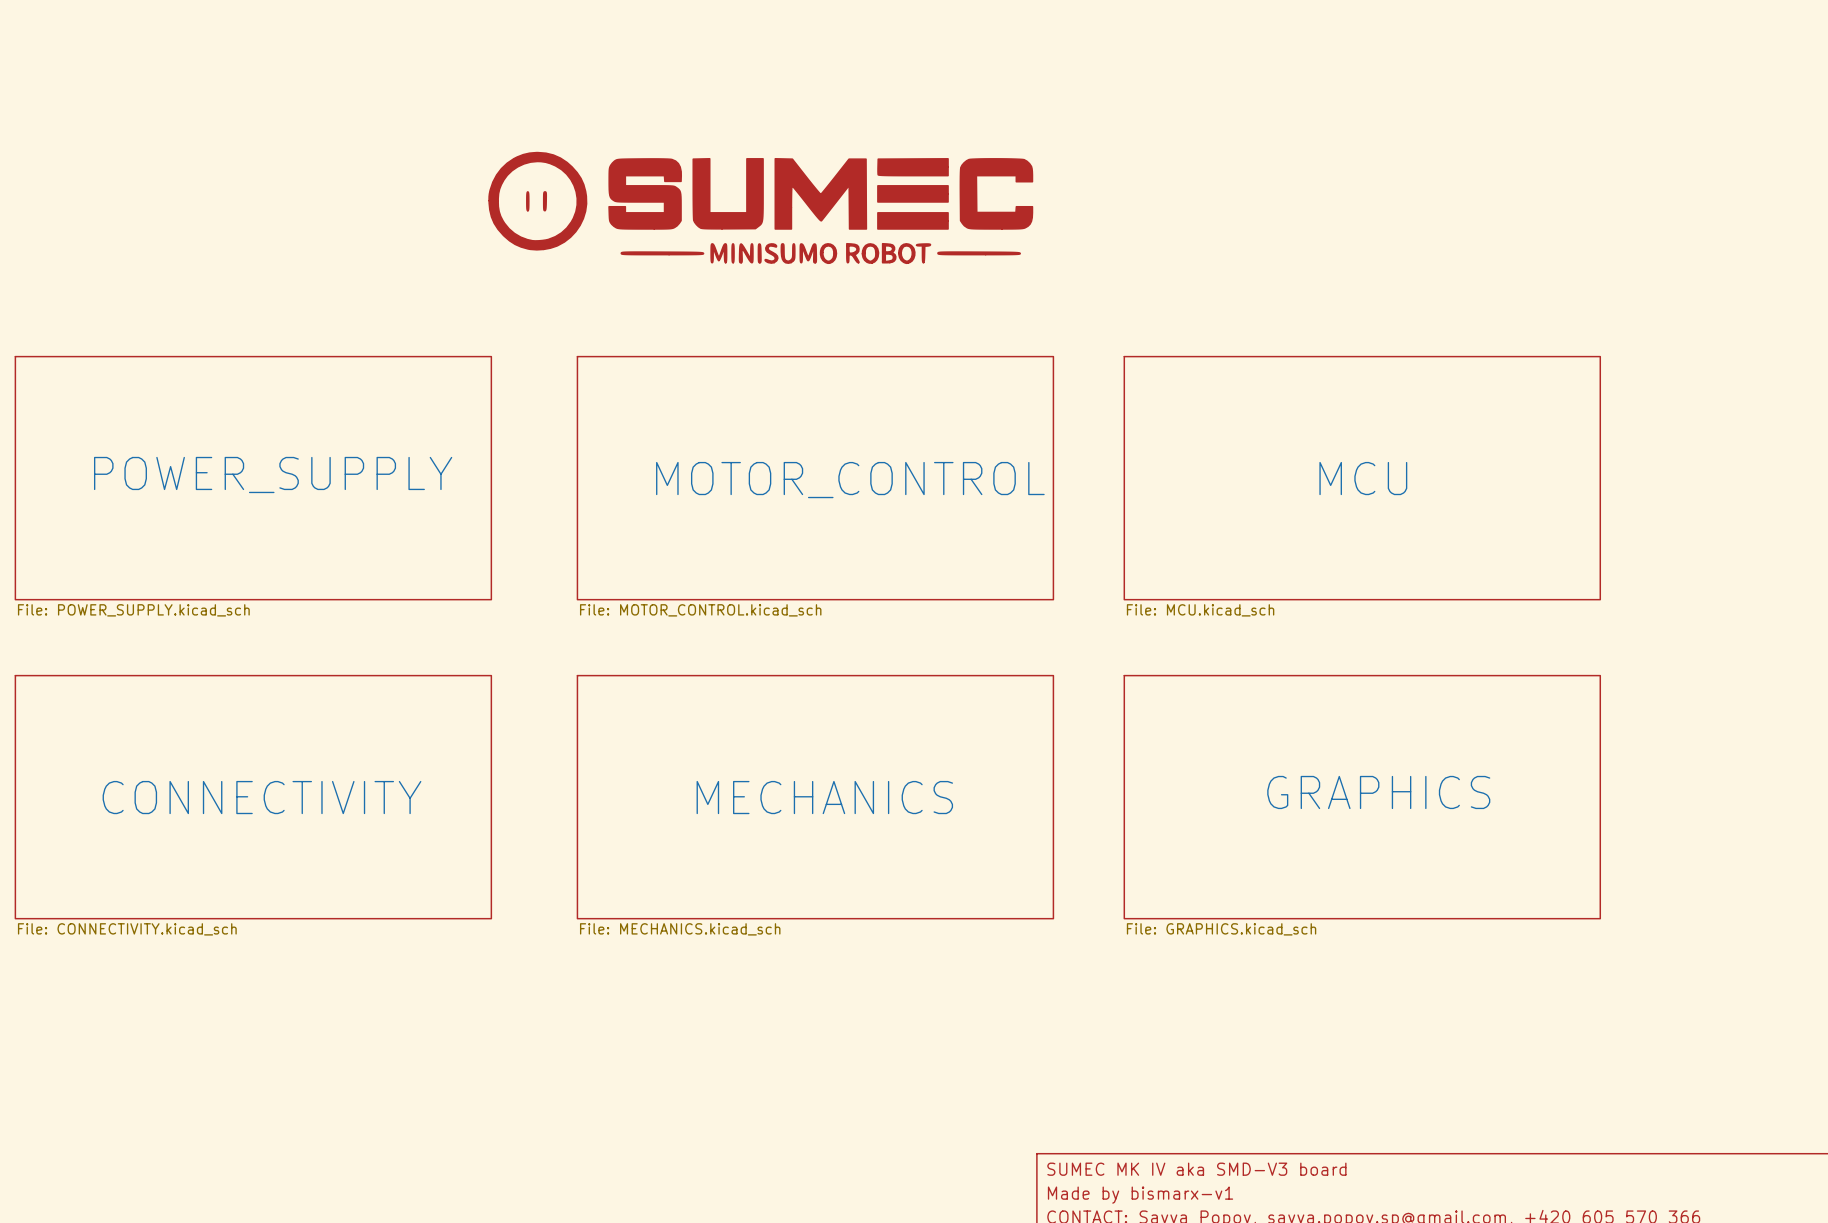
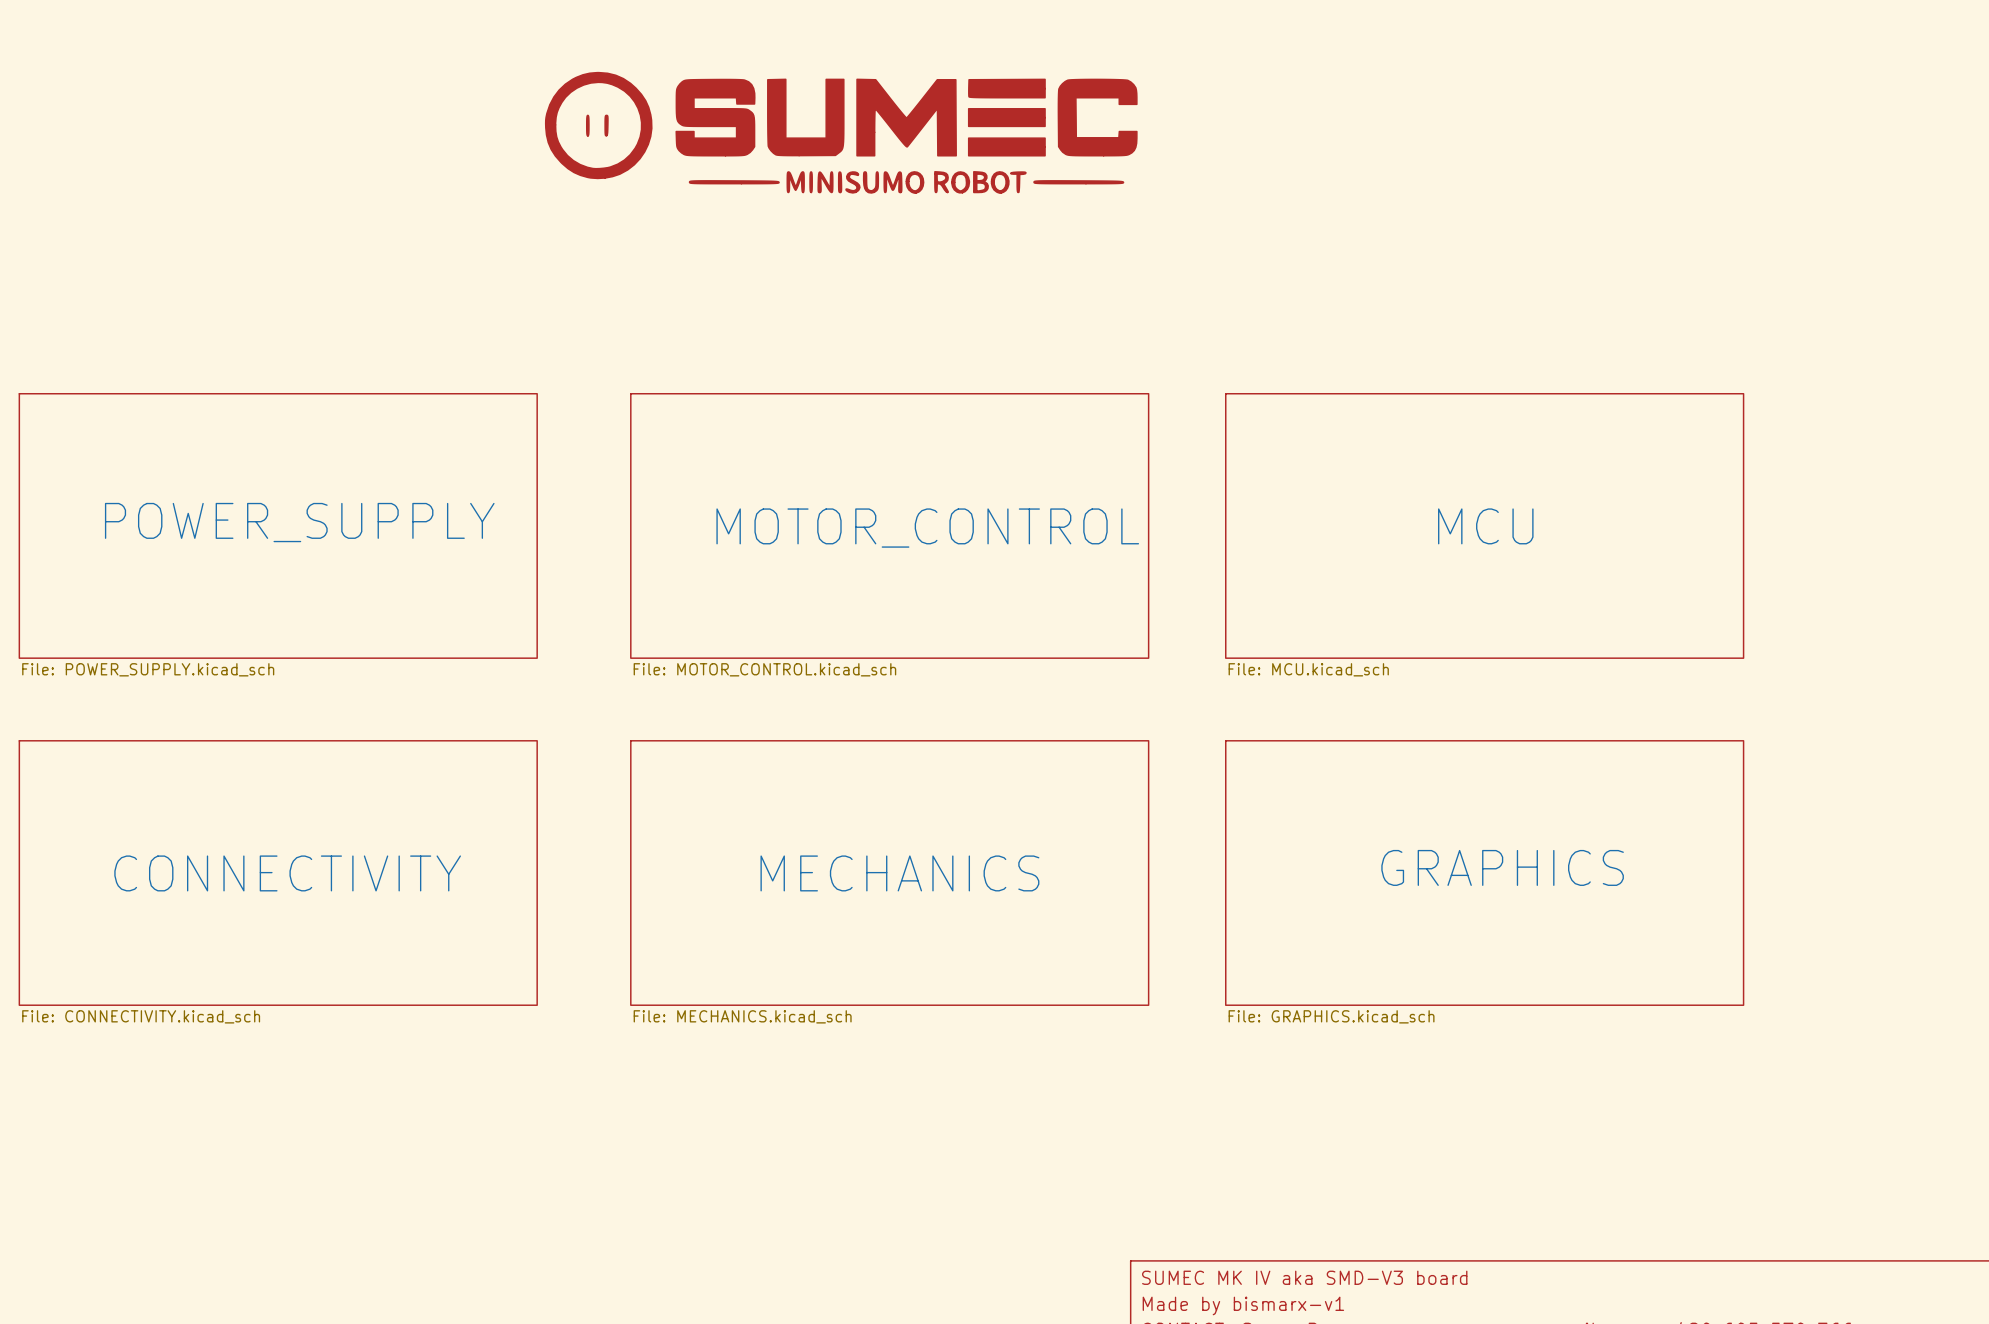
power symbol position: (760, 207) -> (841, 132)

